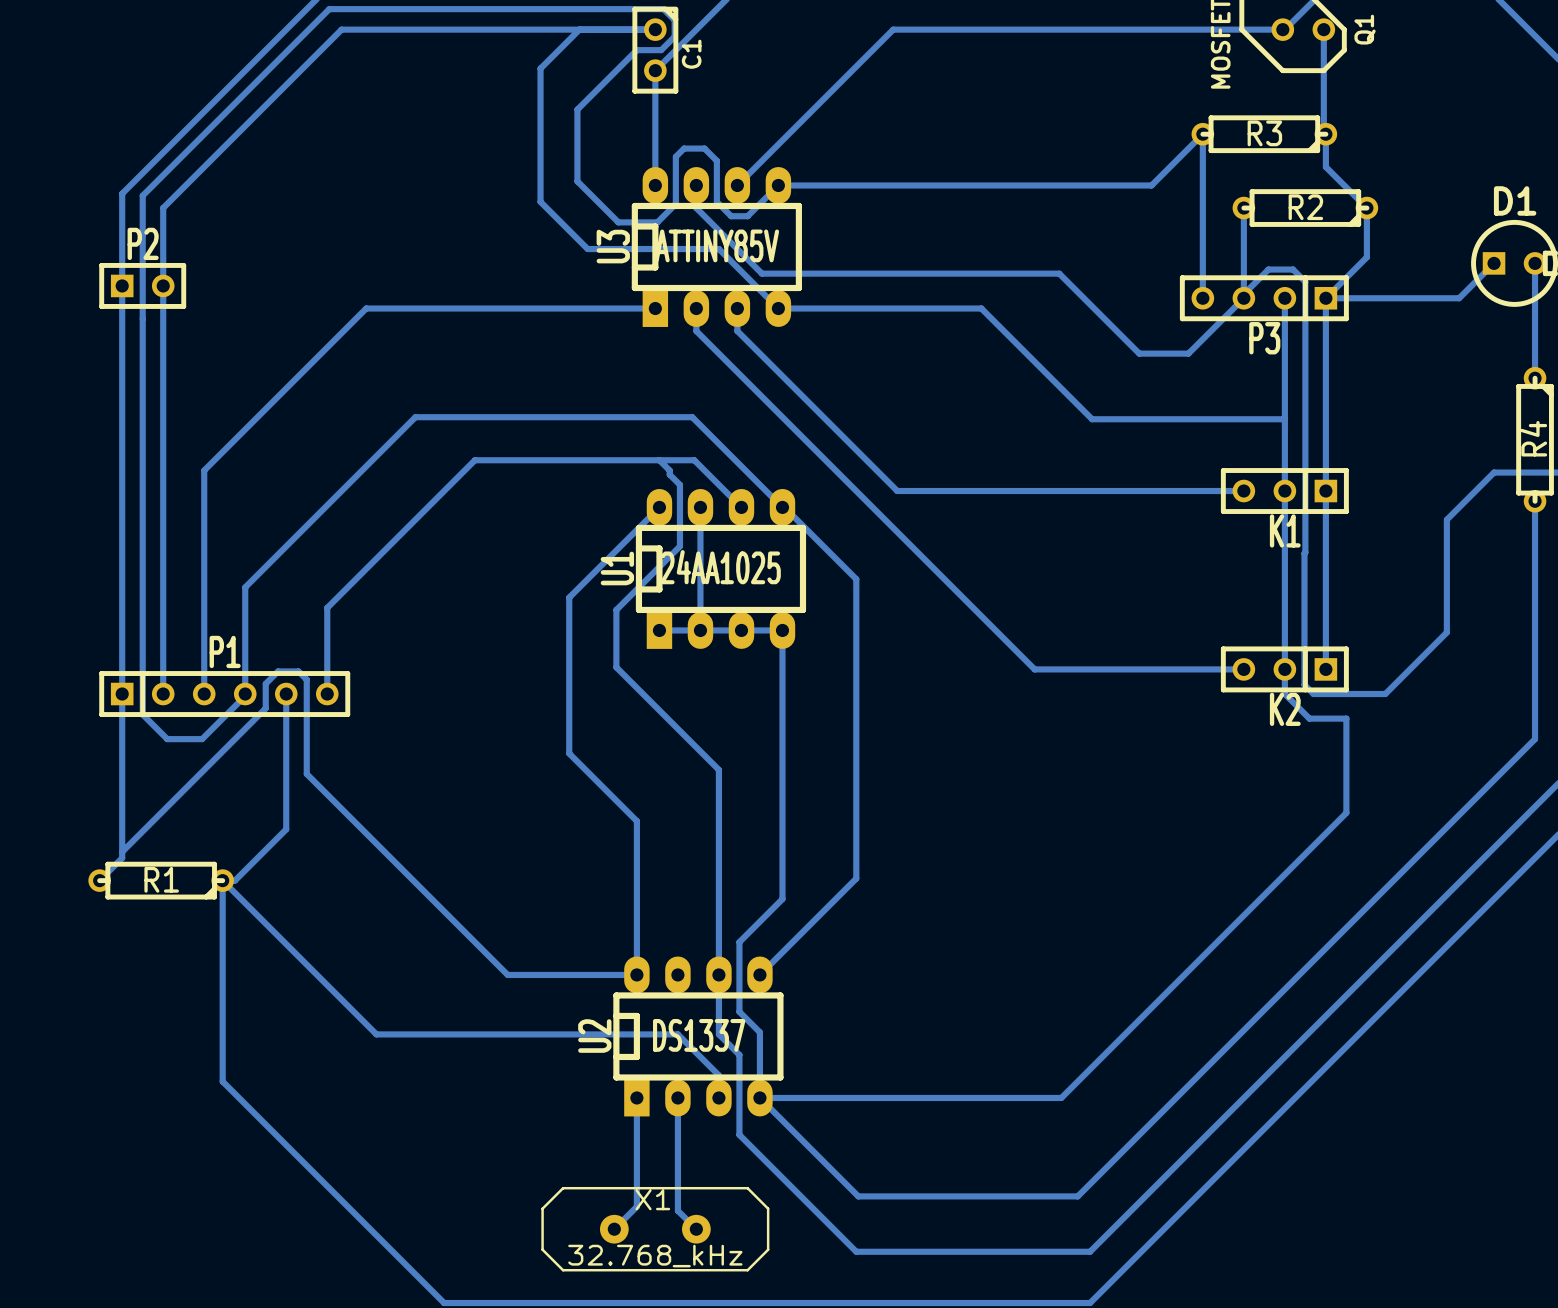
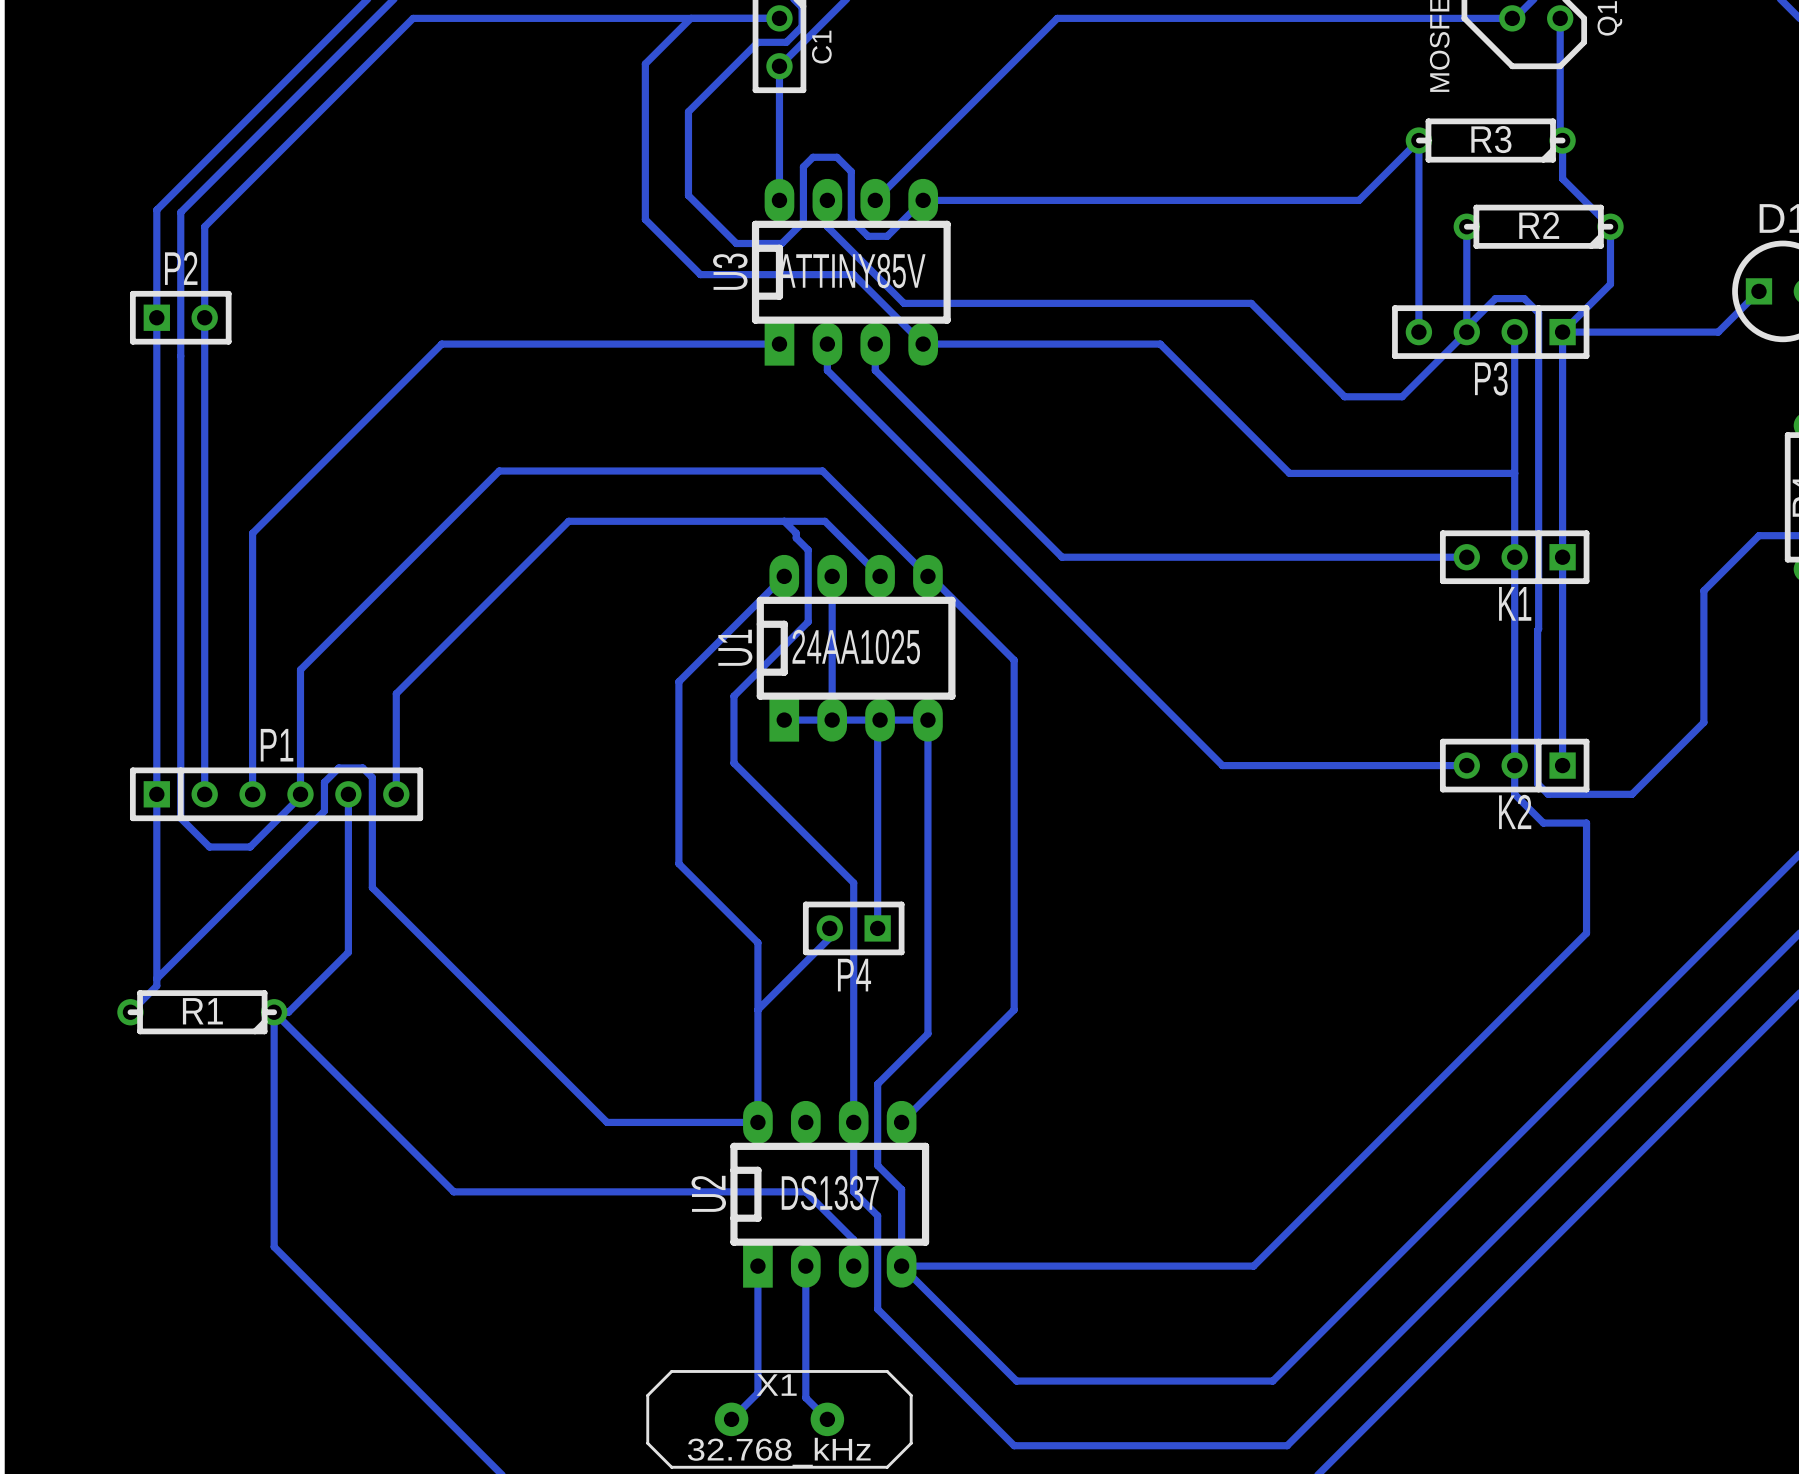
bottom track: none -> (880, 720) (877, 722) (877, 928)
bottom track: none -> (829, 928) (829, 938) (757, 1009)
P4: none -> (853, 928)

